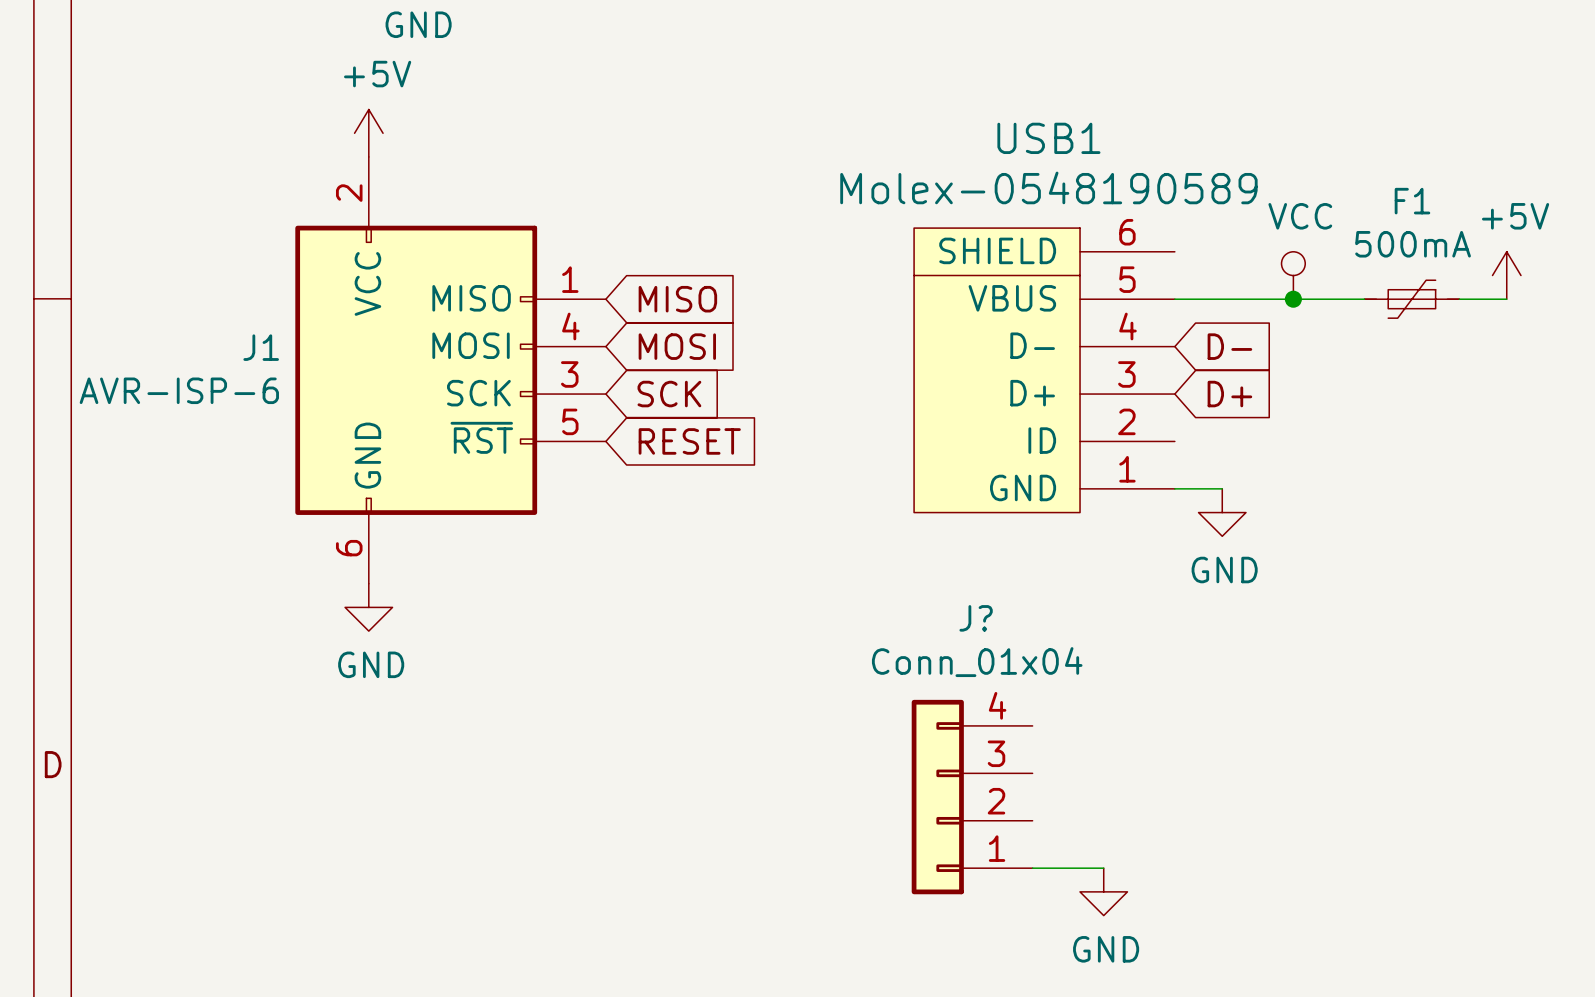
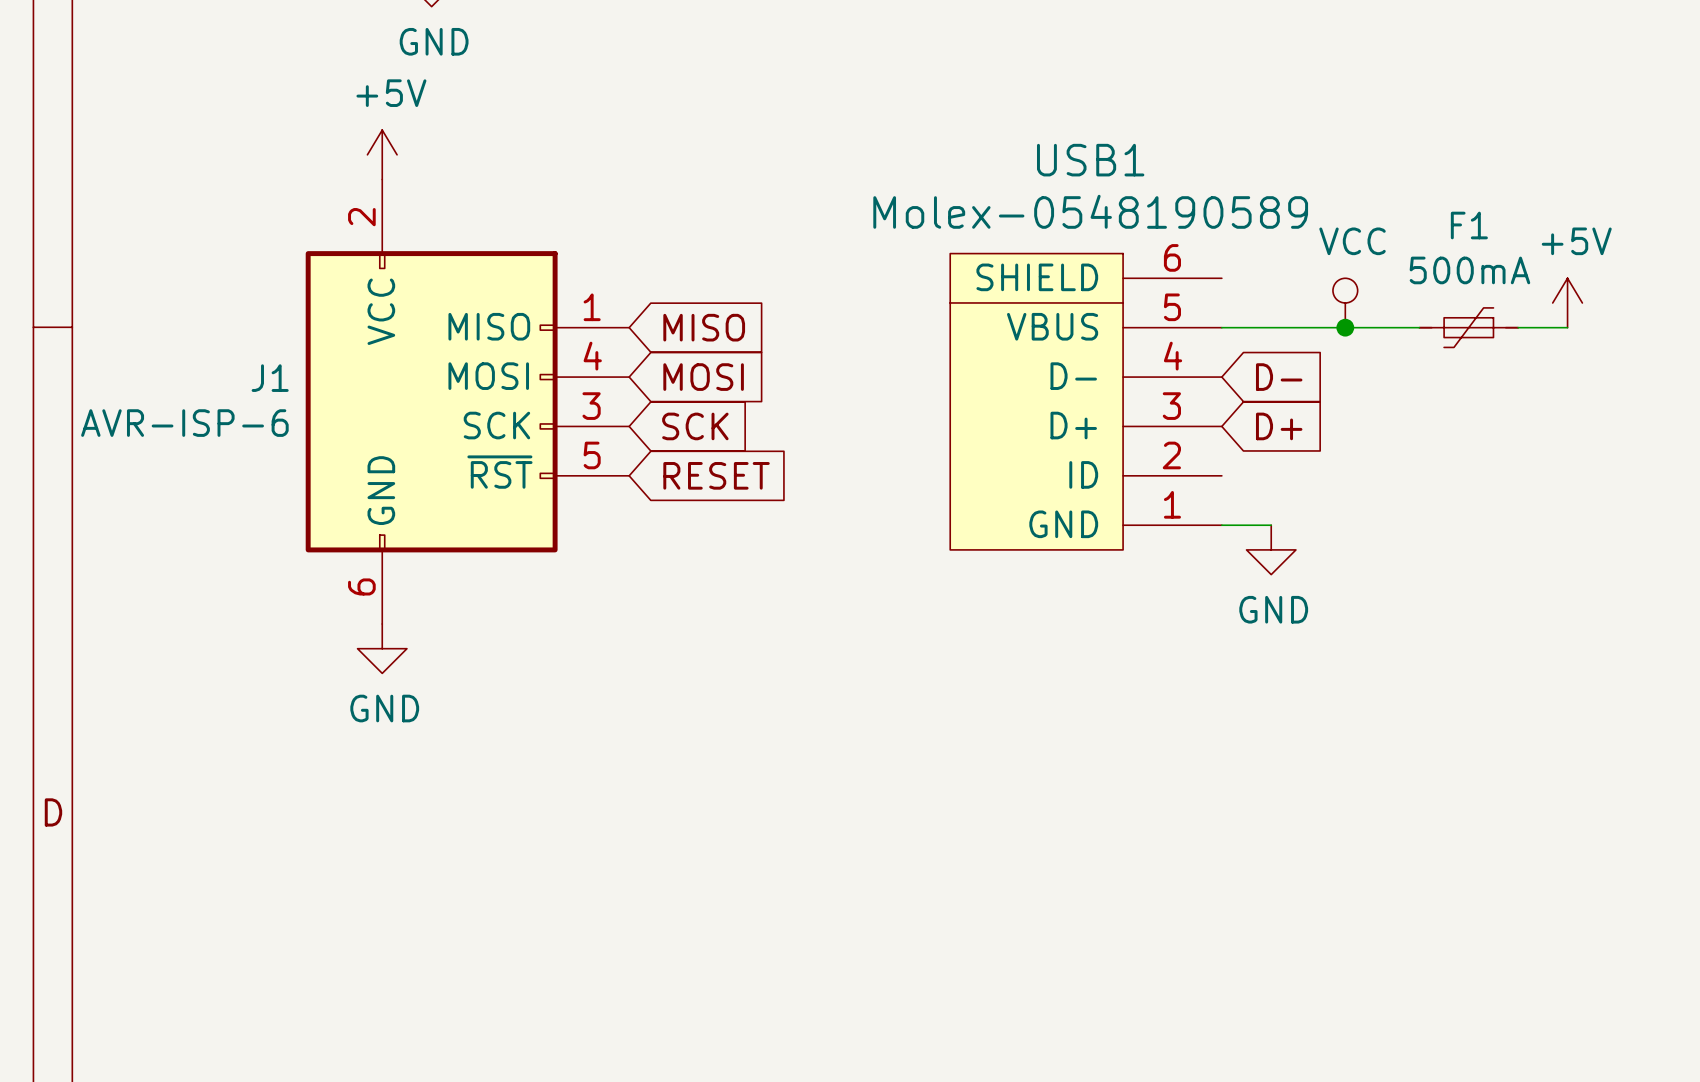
J?: Conn_01x04 (972, 797) -> none
wire: (1032, 868) (1103, 868) -> none
power symbol: GND (1103, 891) -> none

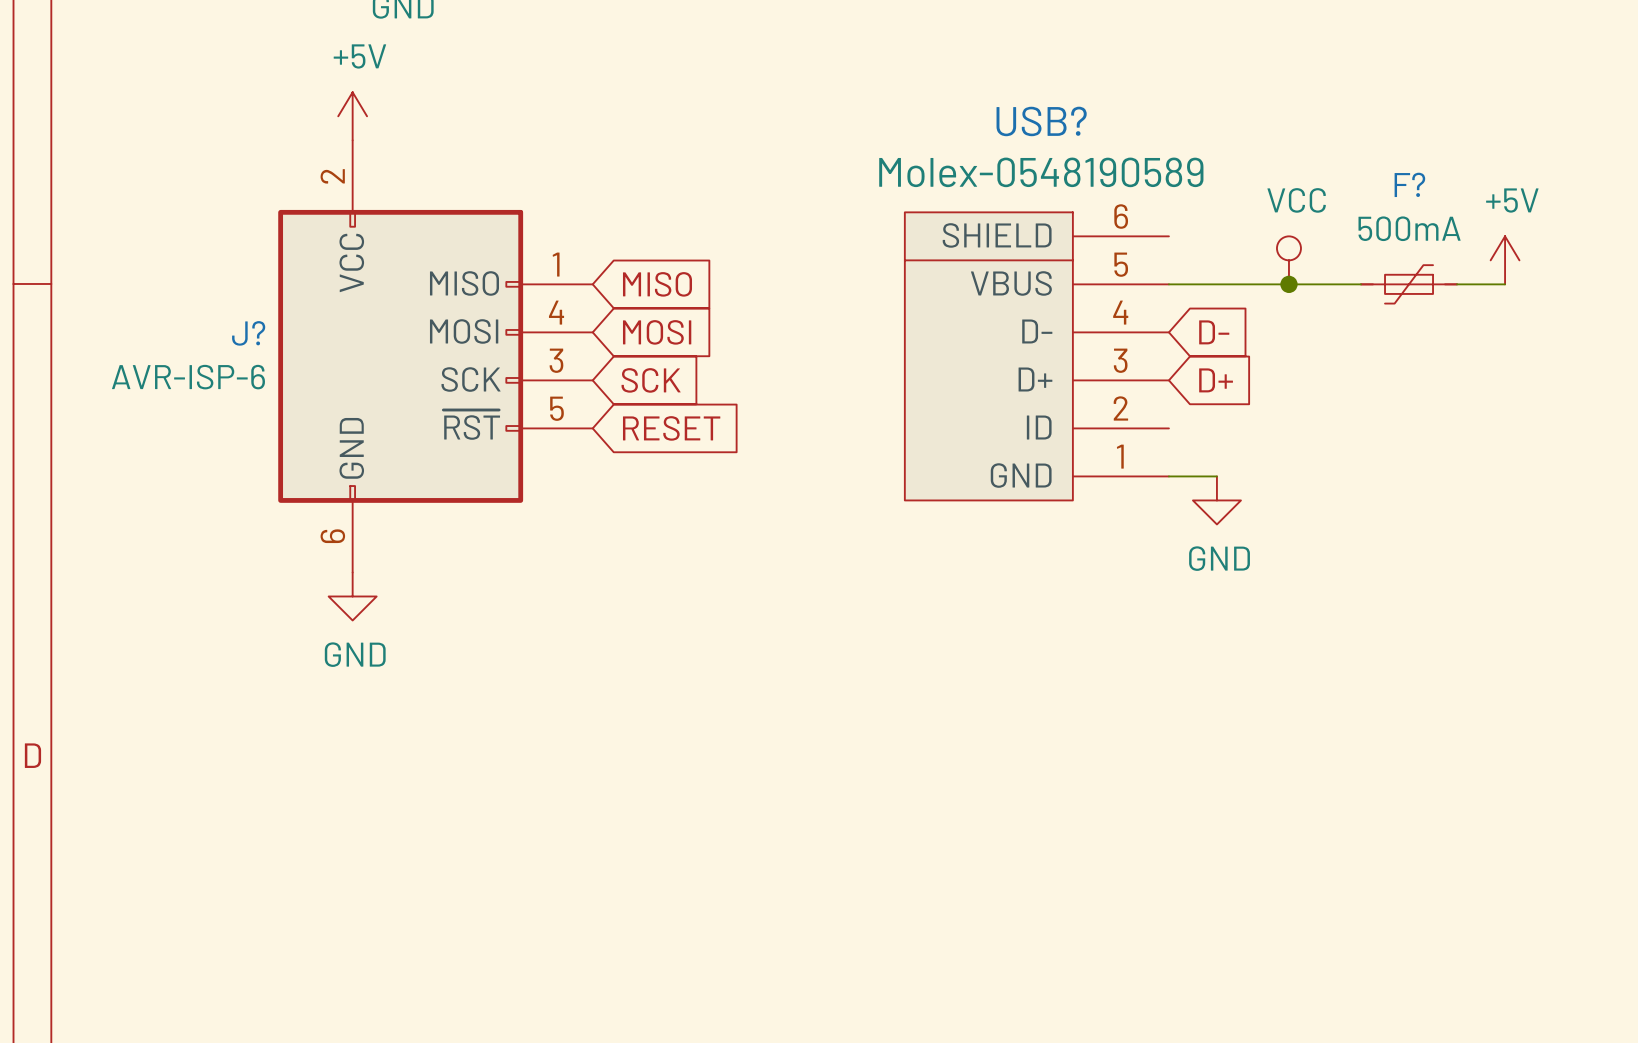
USB1 name: USB1 (1090, 160) -> USB? (1041, 121)
F1 name: F1 (1469, 225) -> F? (1409, 184)
J1 name: J1 (270, 378) -> J? (248, 333)

